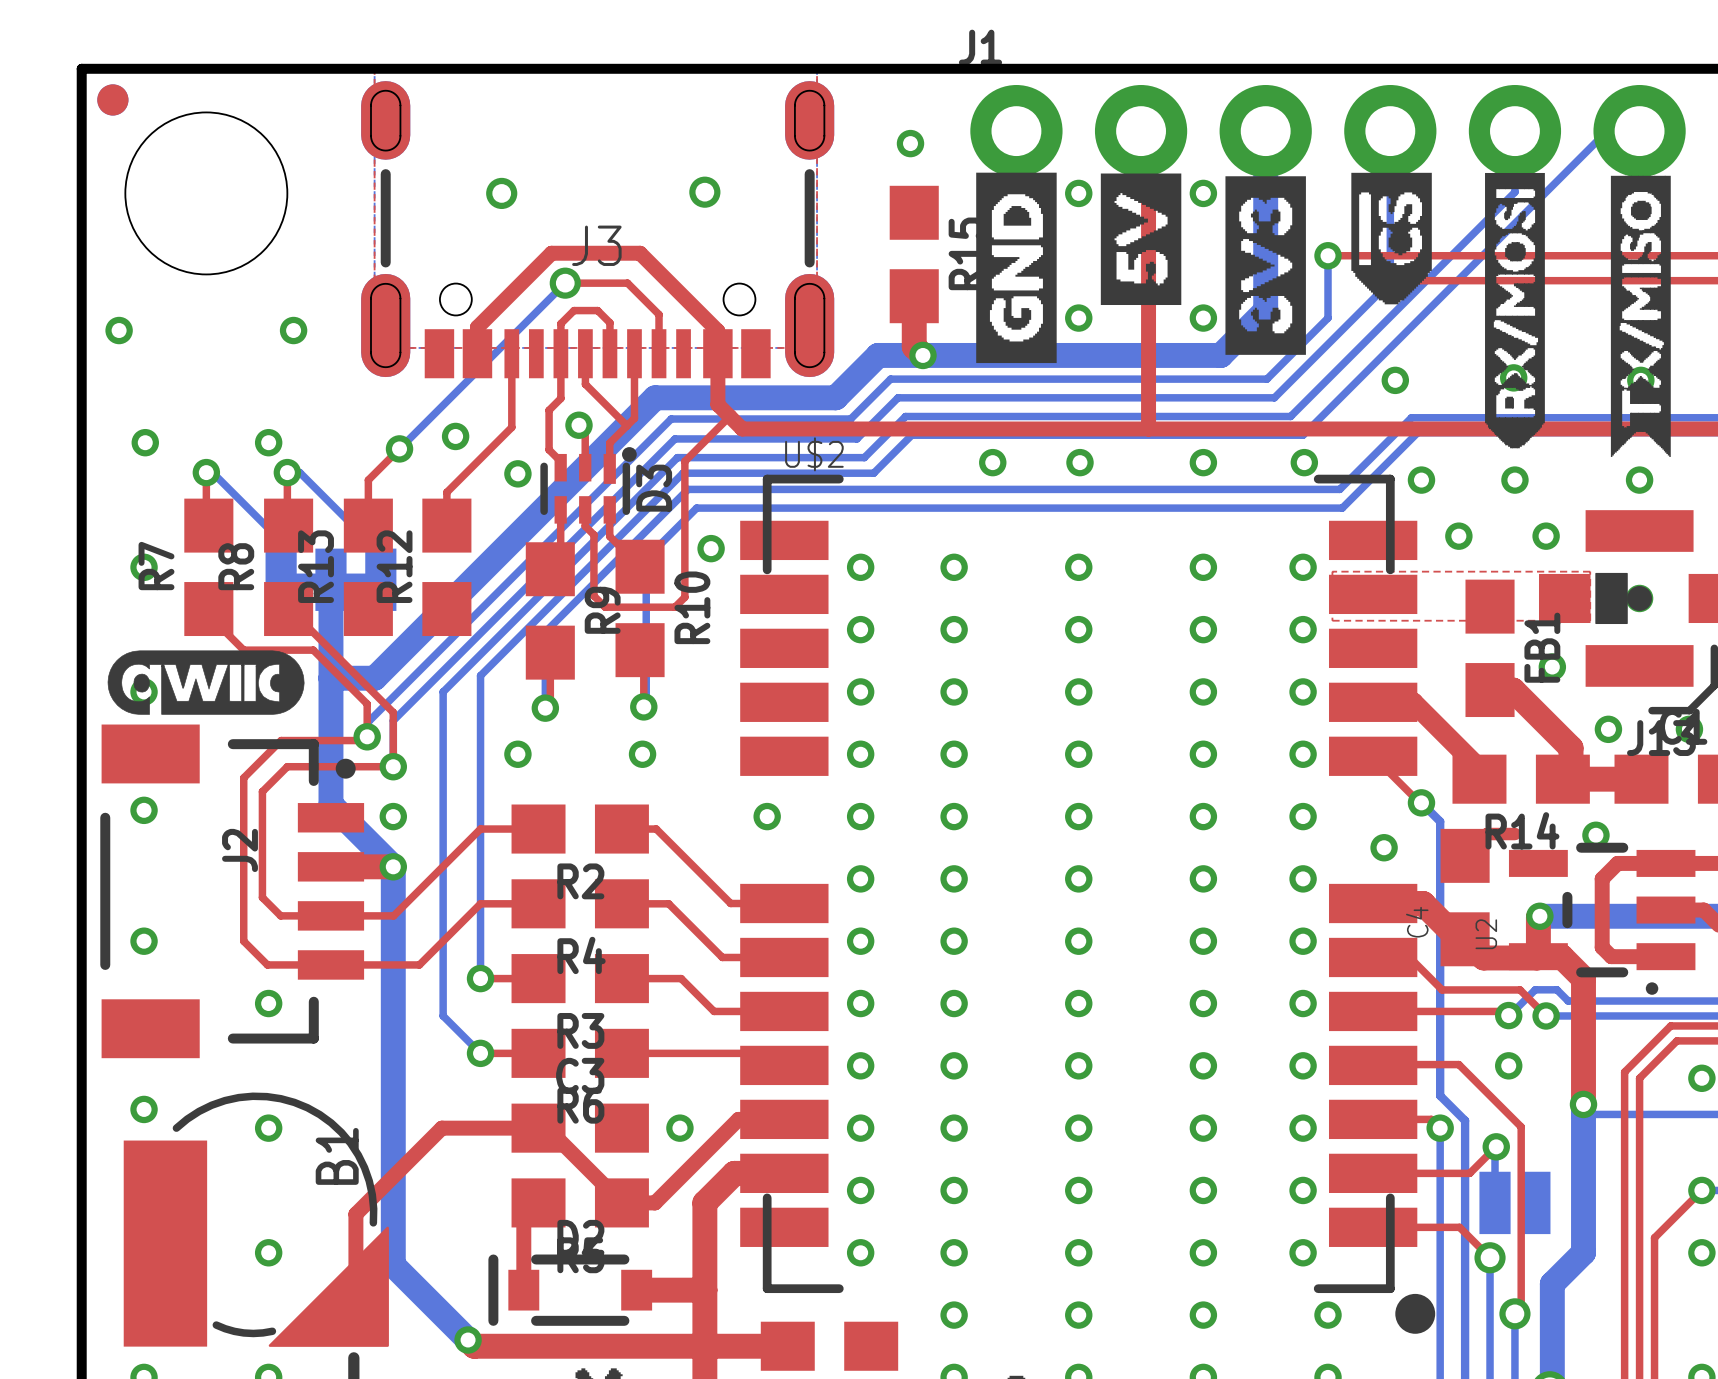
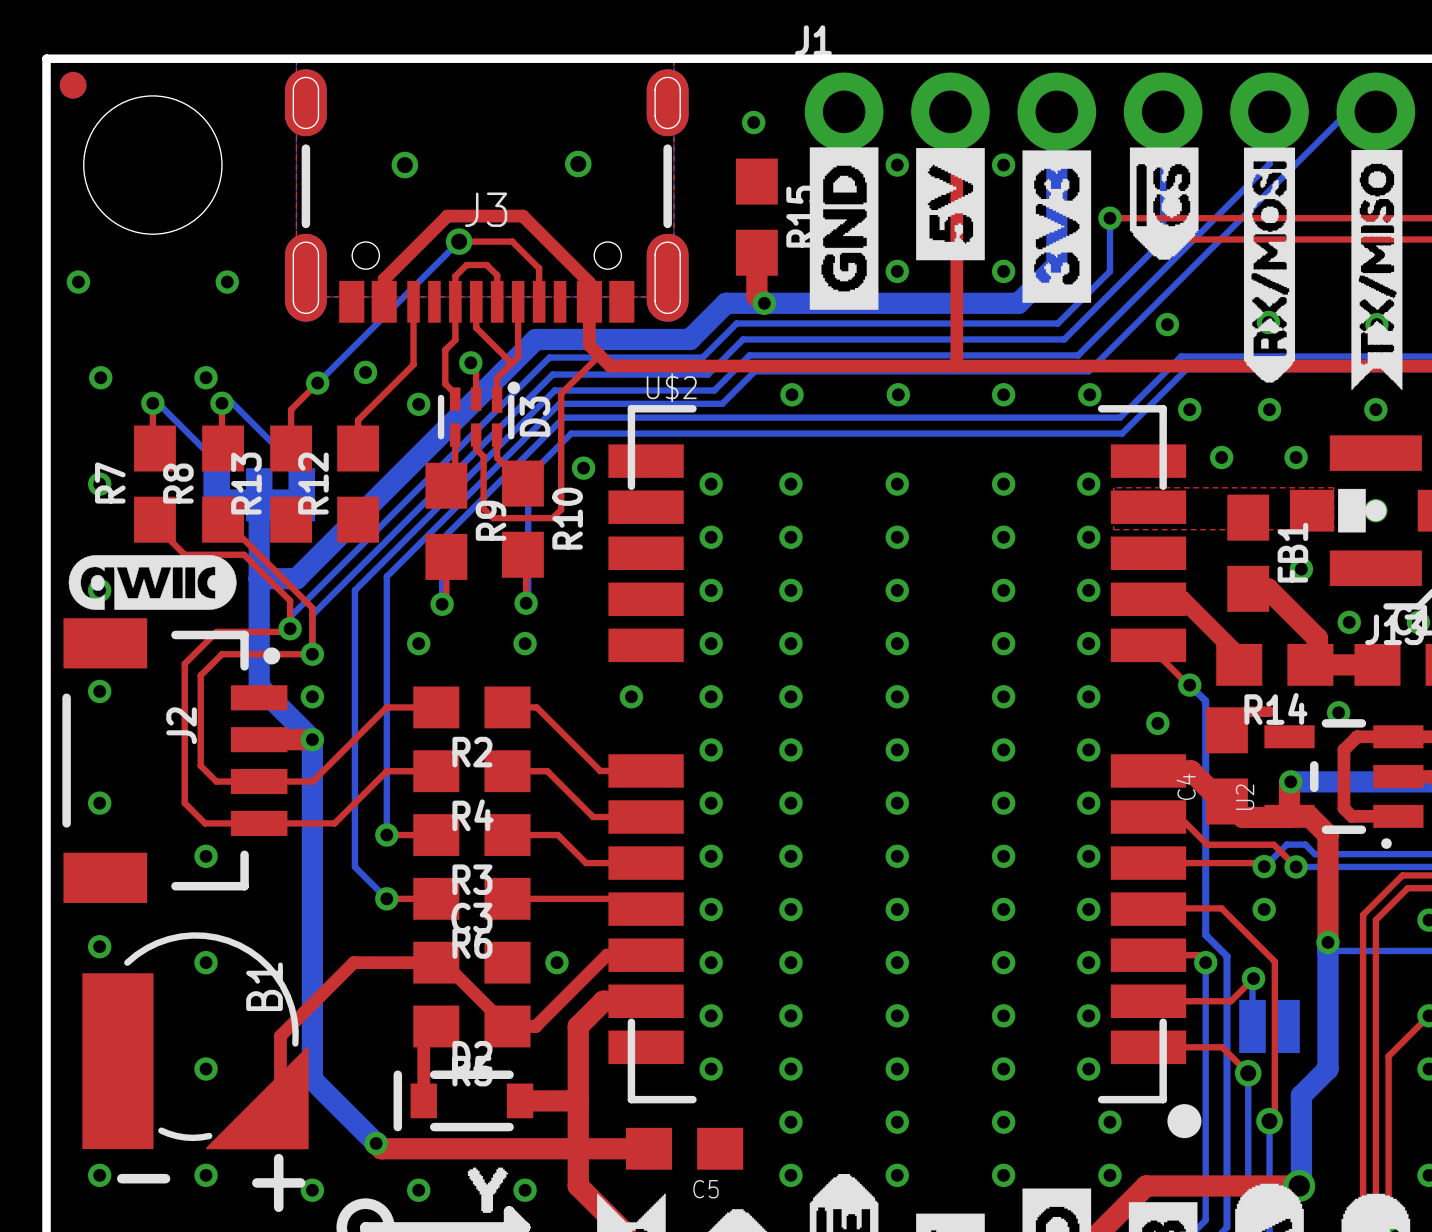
via position: (992, 462) -> (792, 394)

